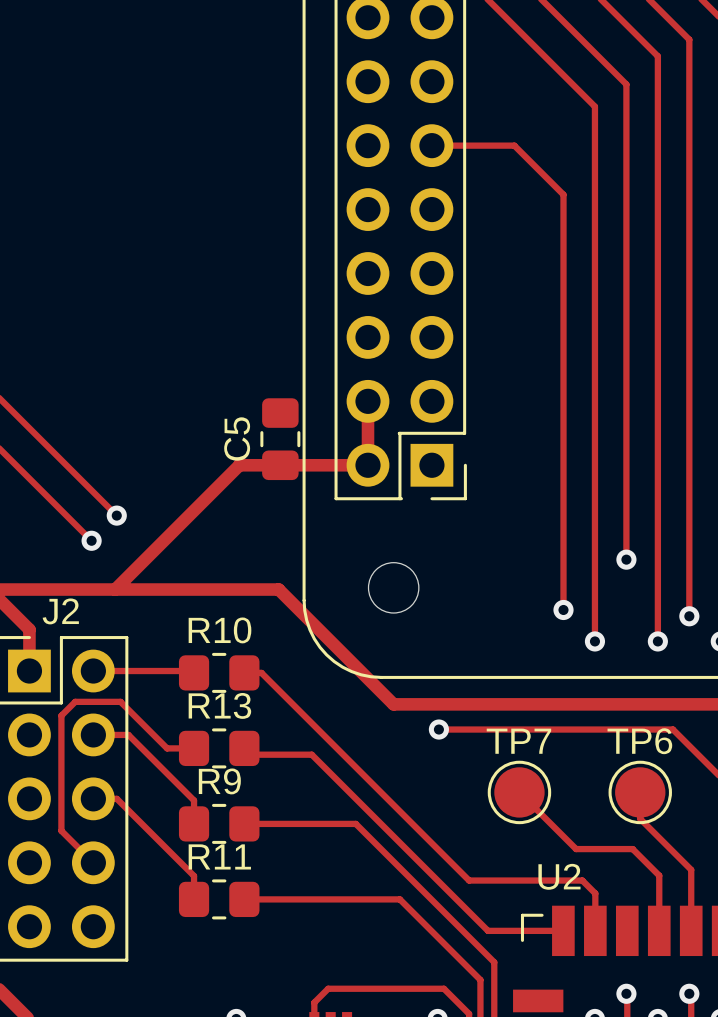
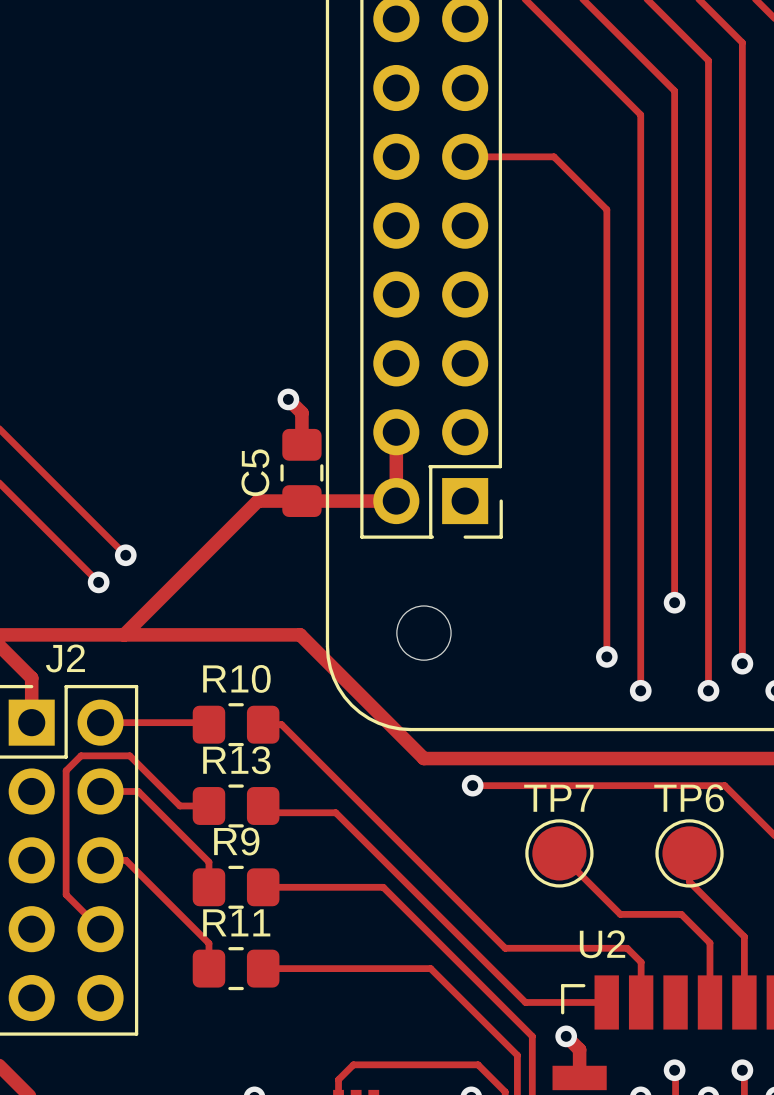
track: none -> (288, 399) (301, 412) (301, 444)
via: none -> (288, 399)
track: none -> (566, 1036) (579, 1049) (579, 1077)
via: none -> (566, 1036)

